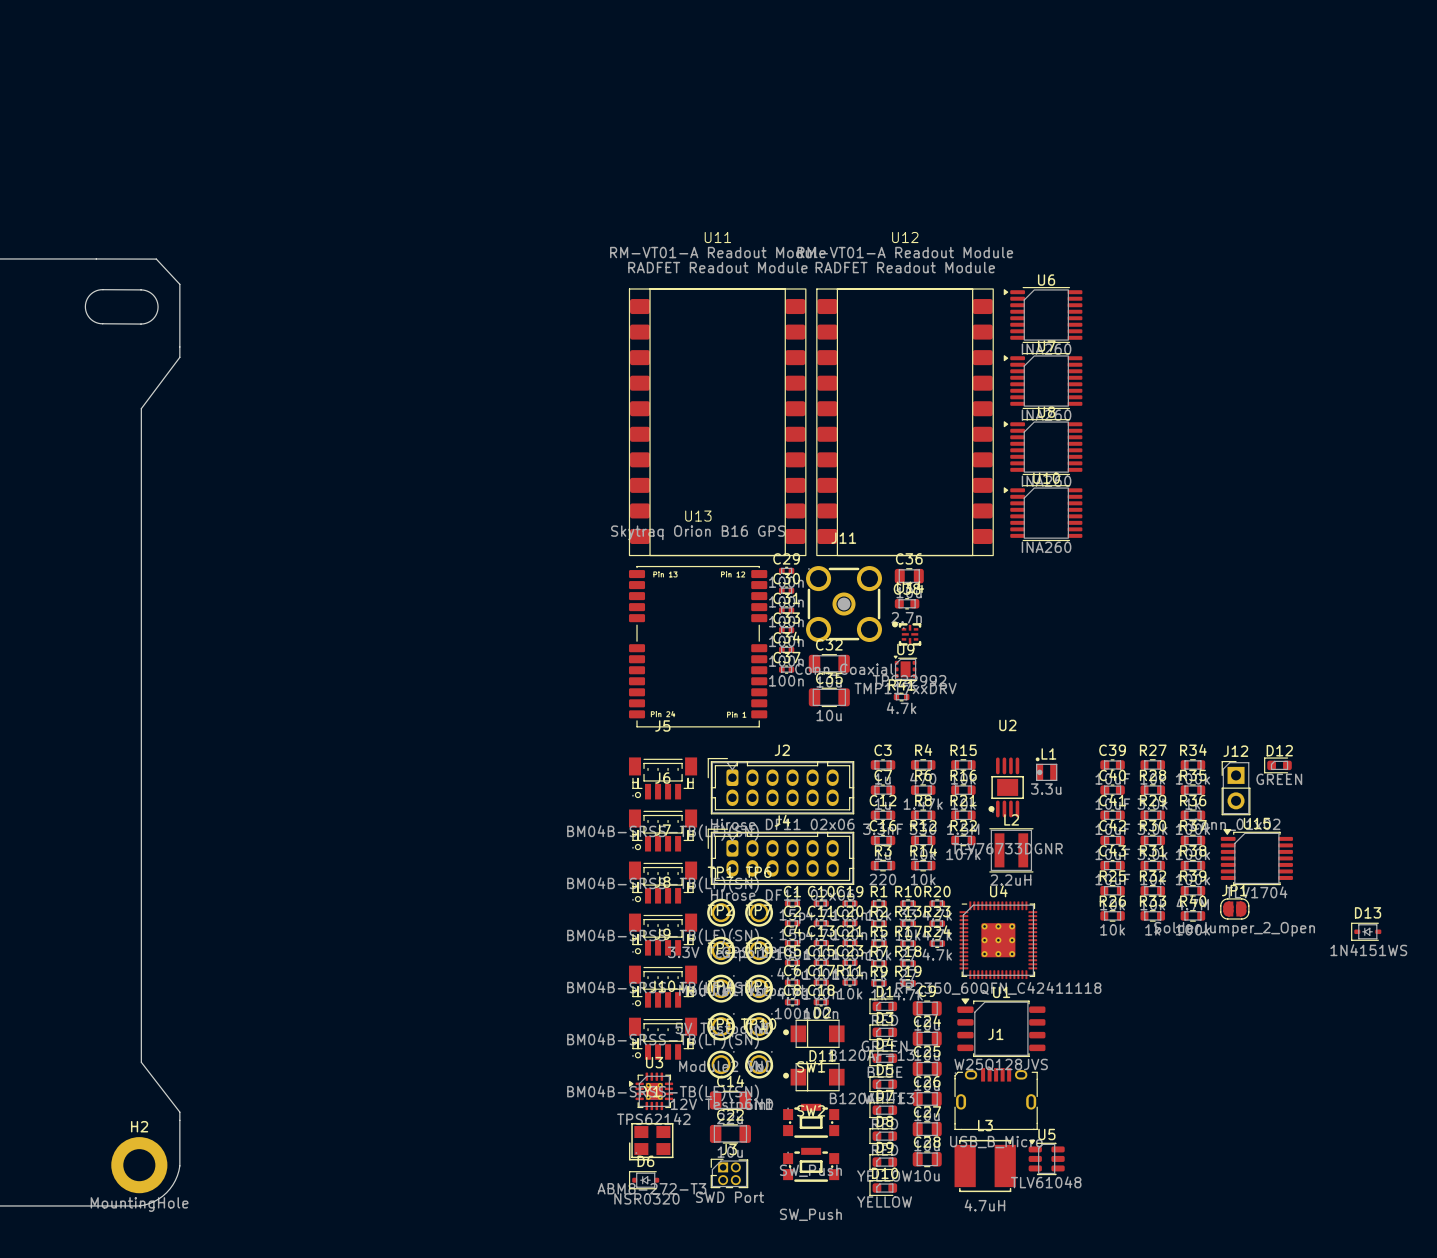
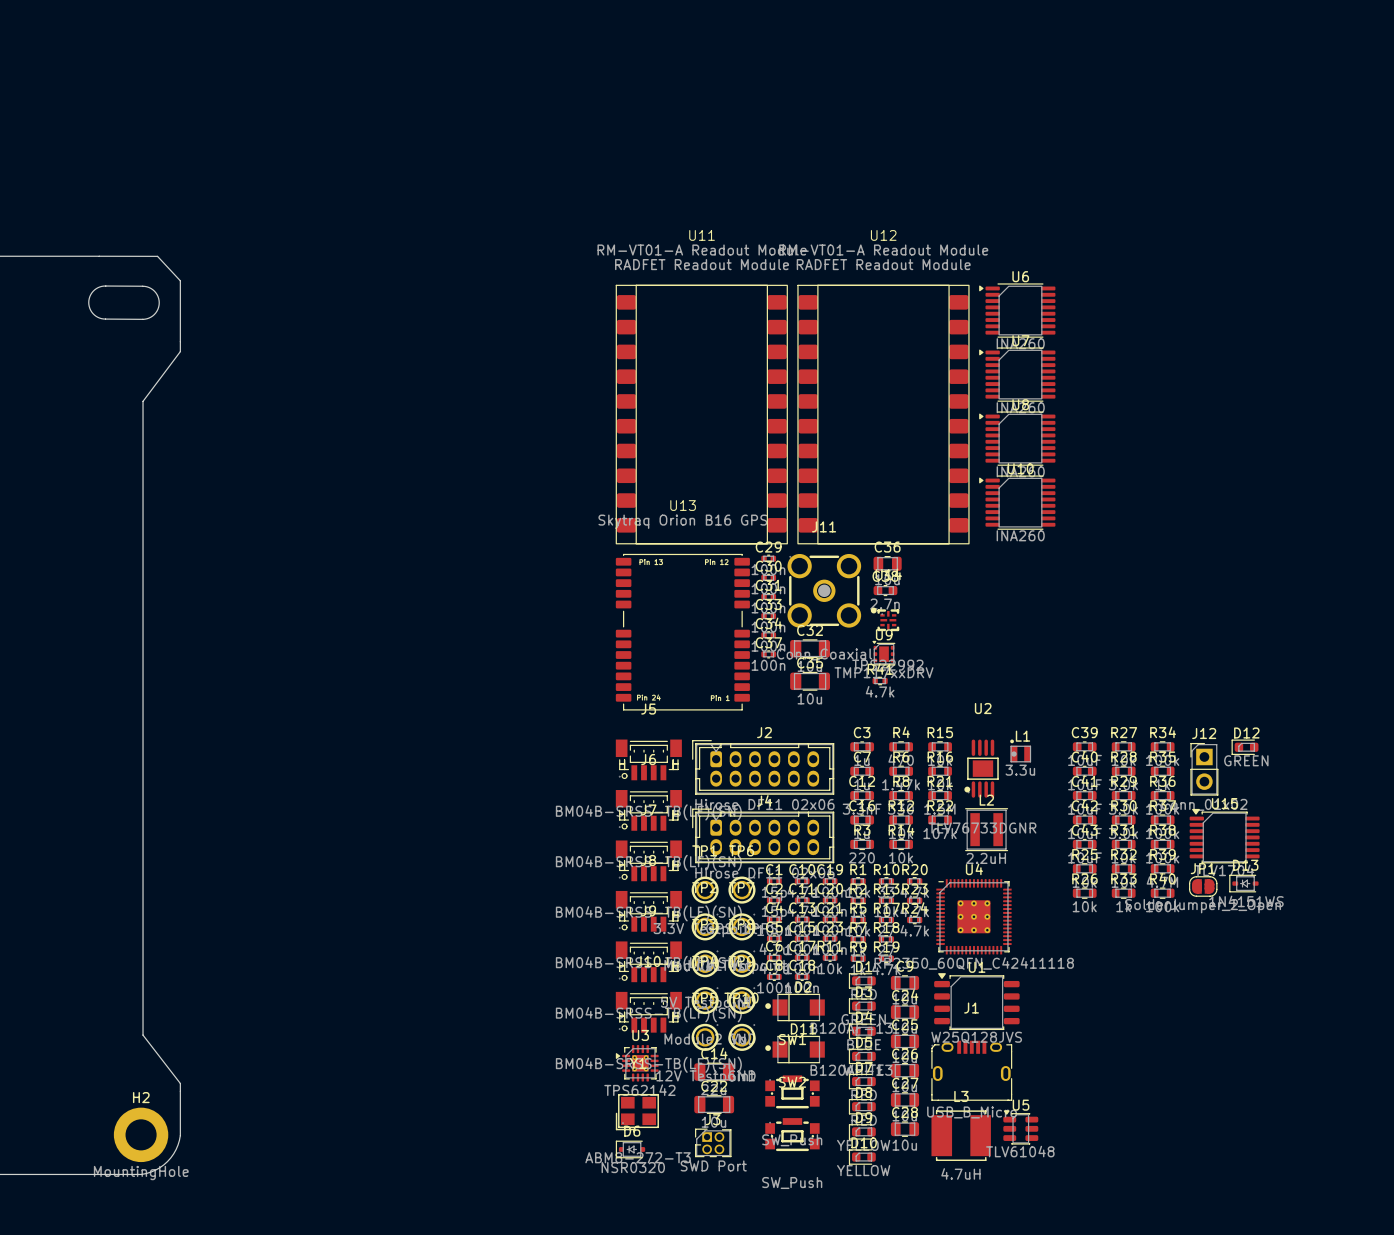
D13 position: (1366, 931) -> (1243, 883)

